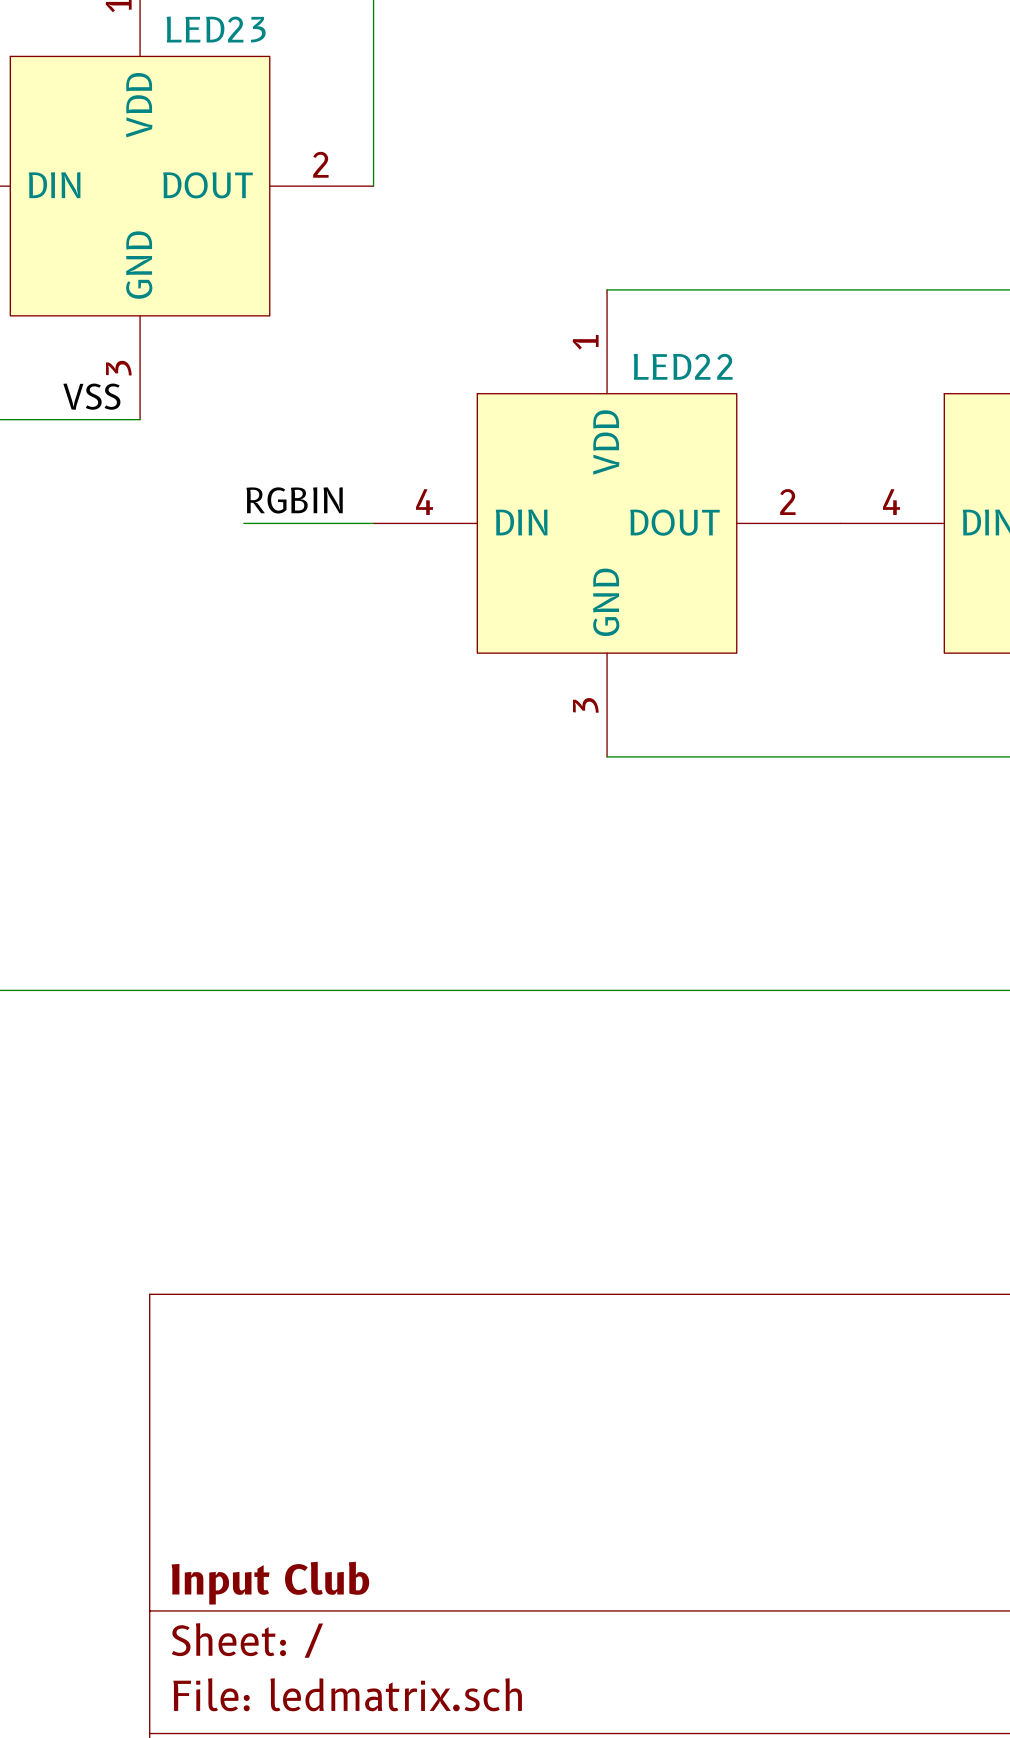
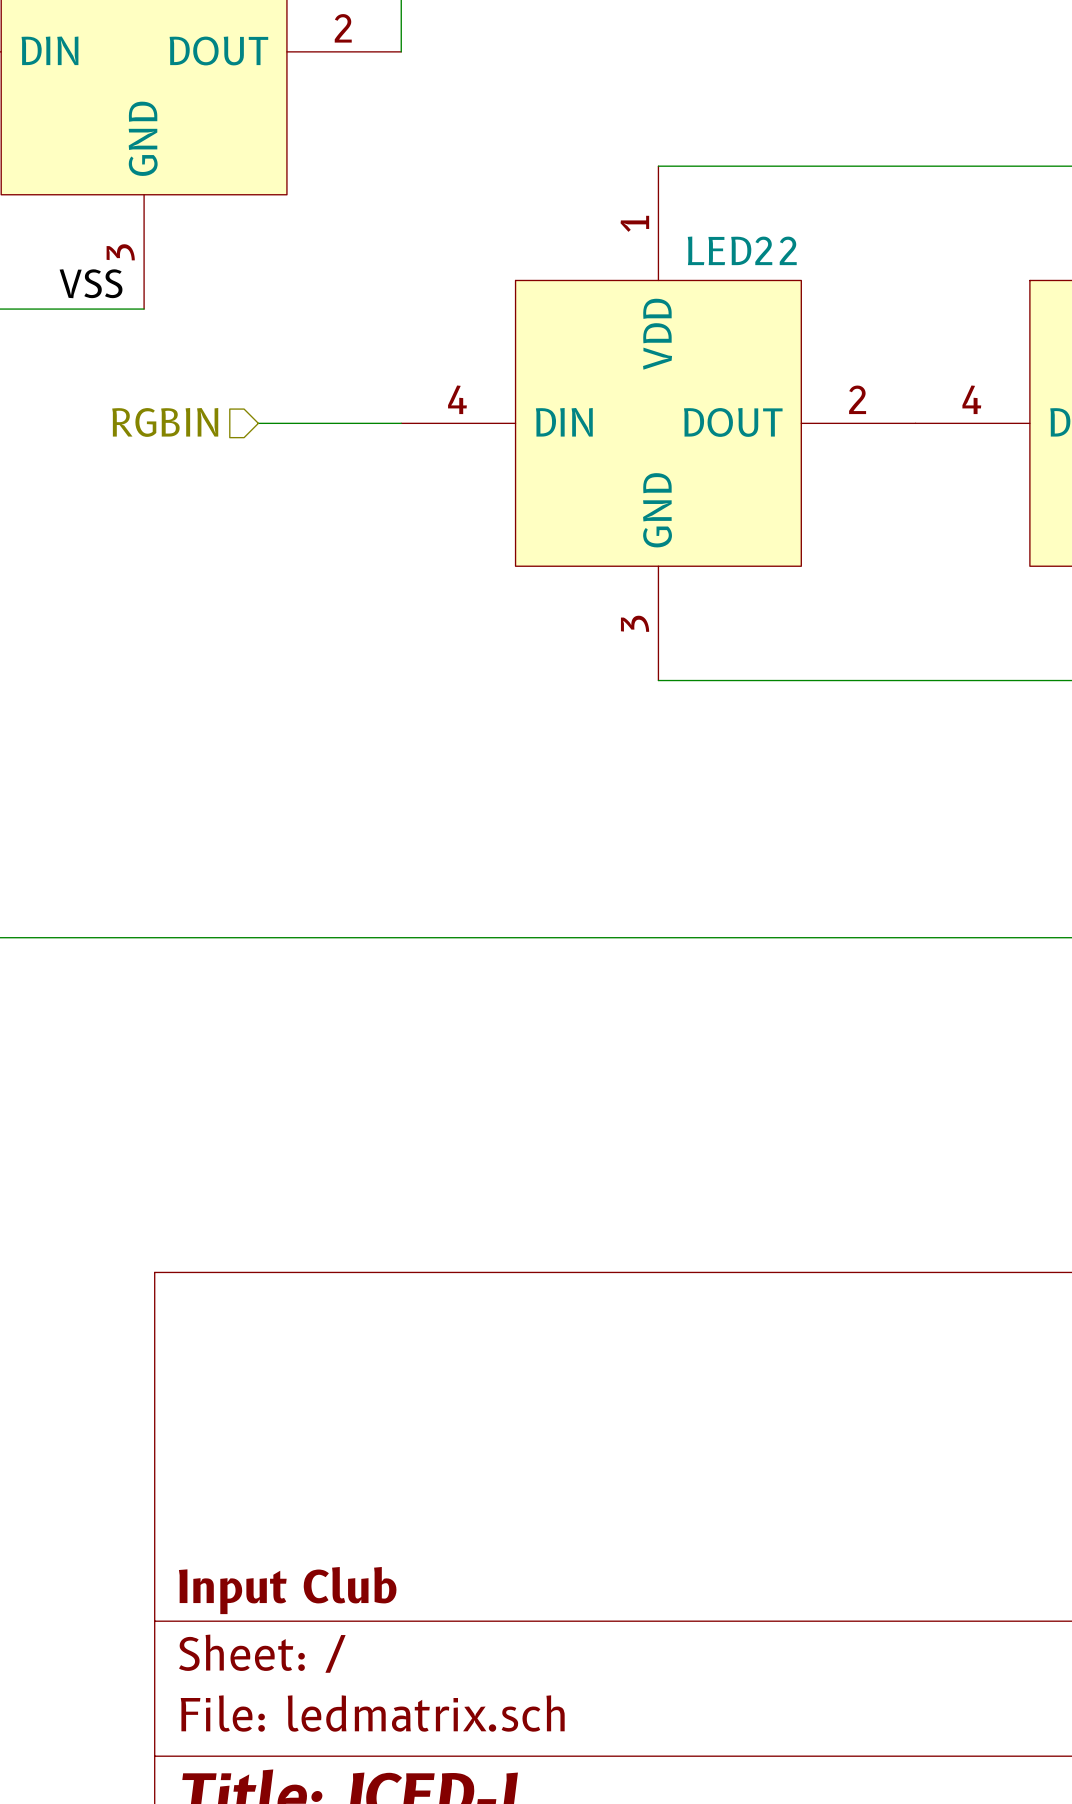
label: RGBIN (294, 500) -> none
hierarchical label: none -> RGBIN (165, 422)

